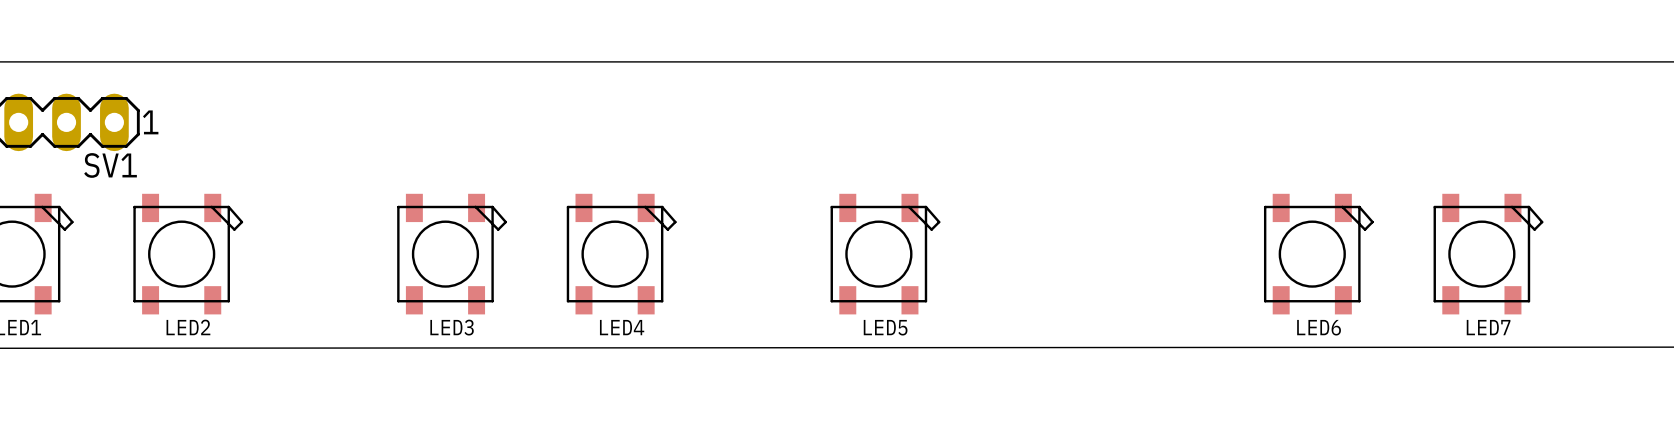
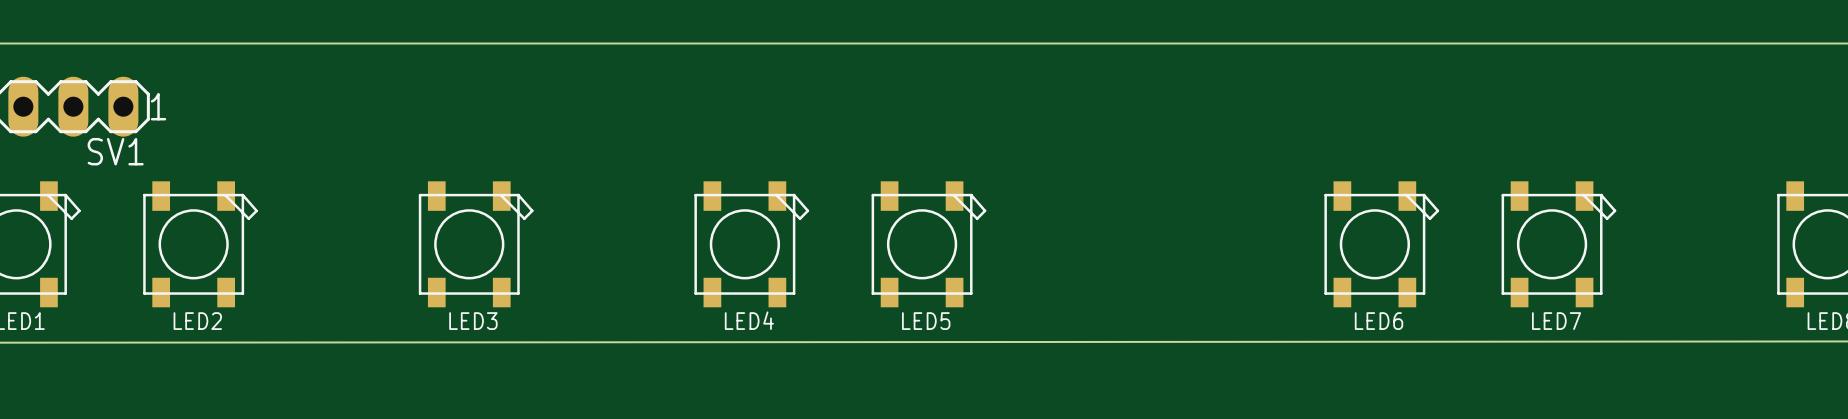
LED4 position: (621, 254) -> (751, 244)

